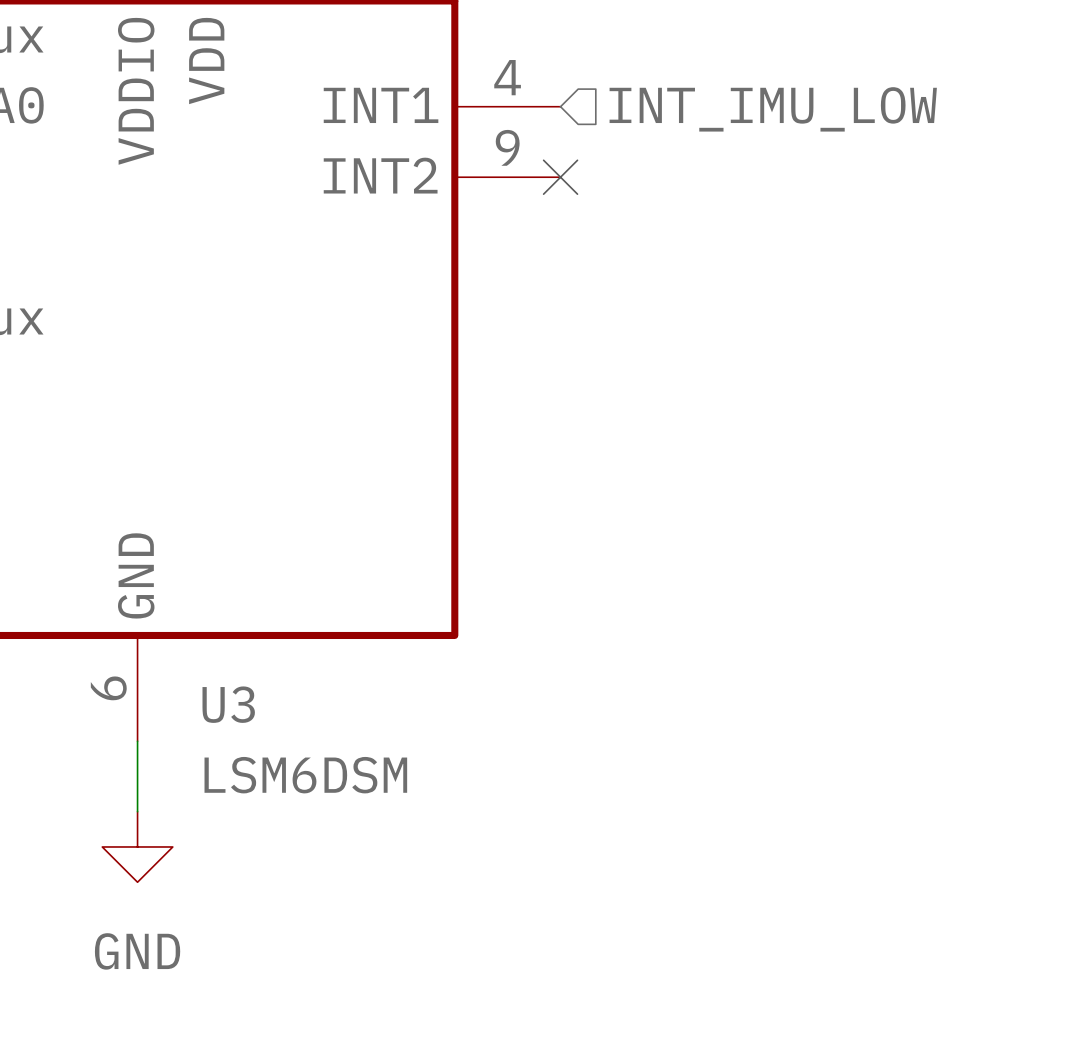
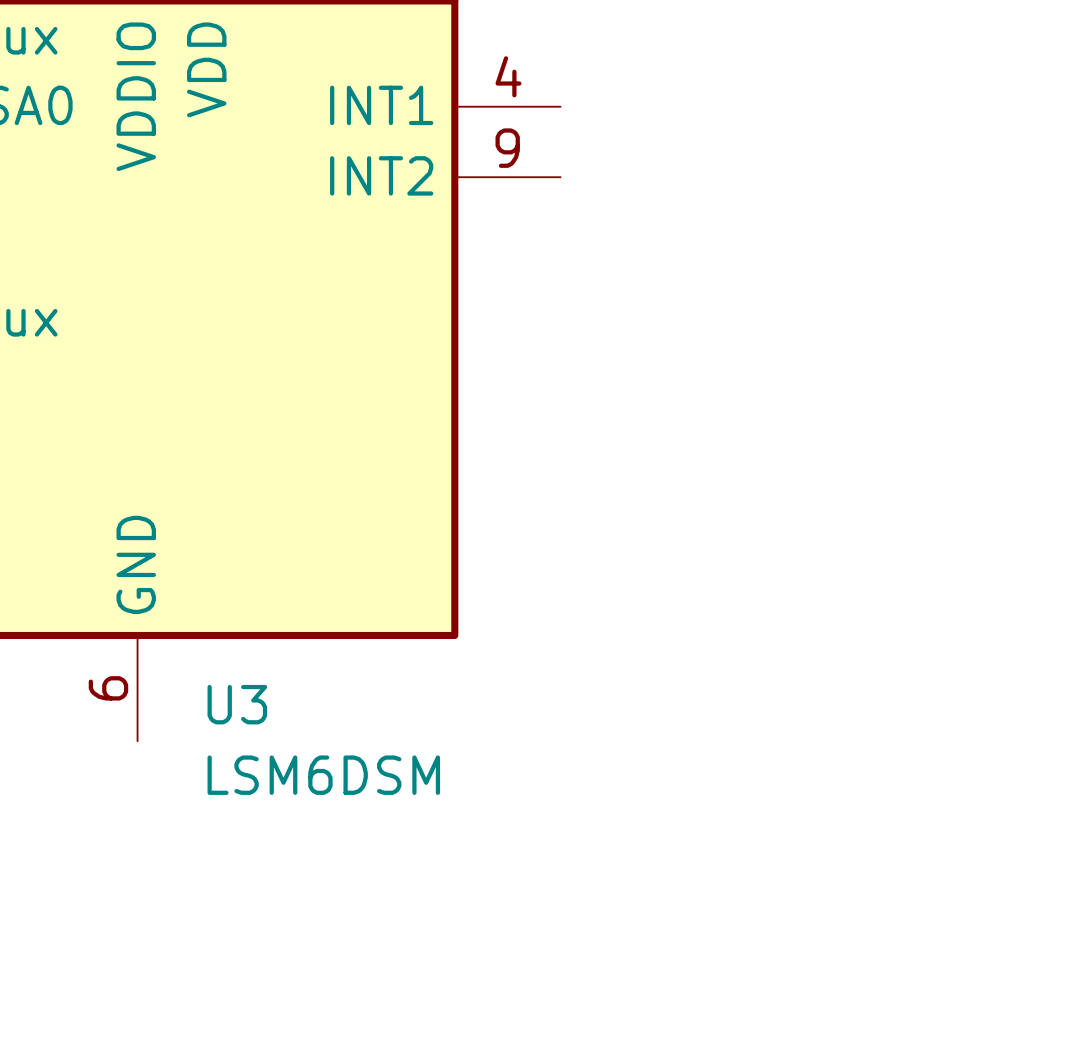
hierarchical label: INT_IMU_LOW (773, 109) -> none
no-connect mark: (560, 177) -> none
wire: (137, 741) (137, 811) -> none
power symbol: GND (137, 846) -> none

